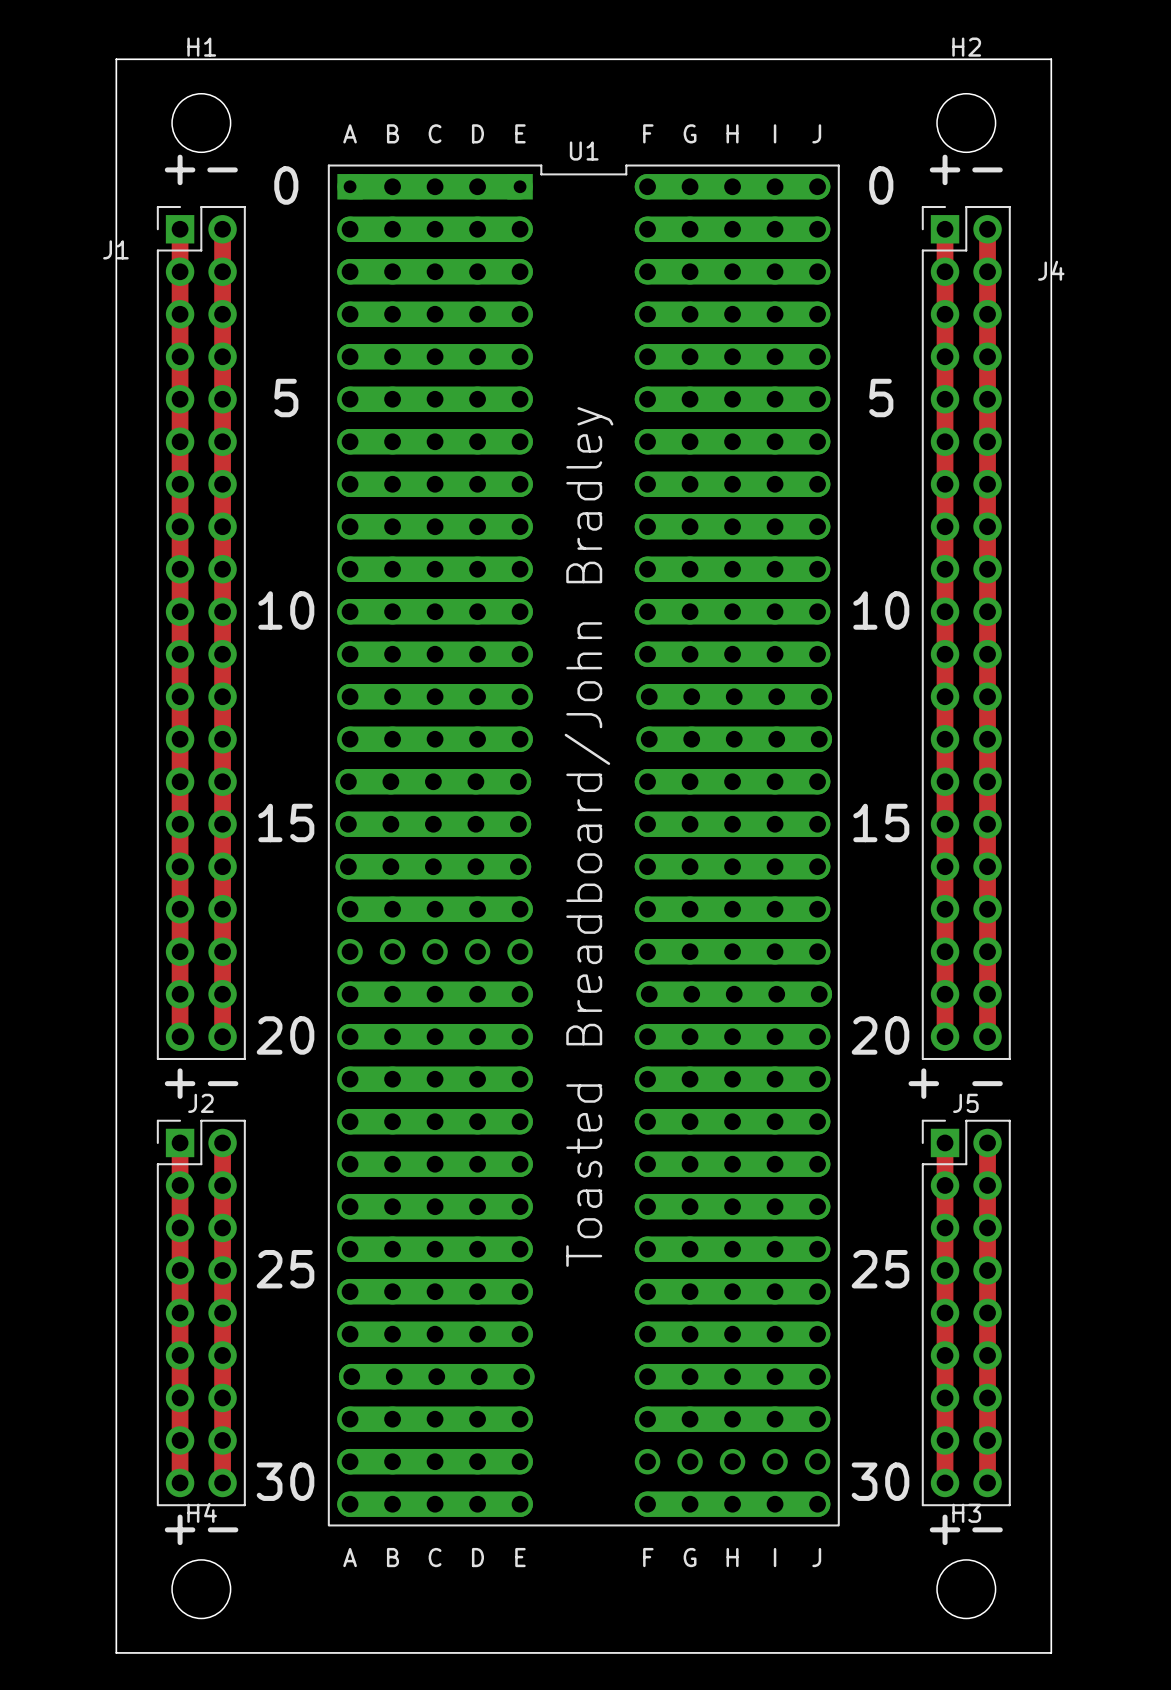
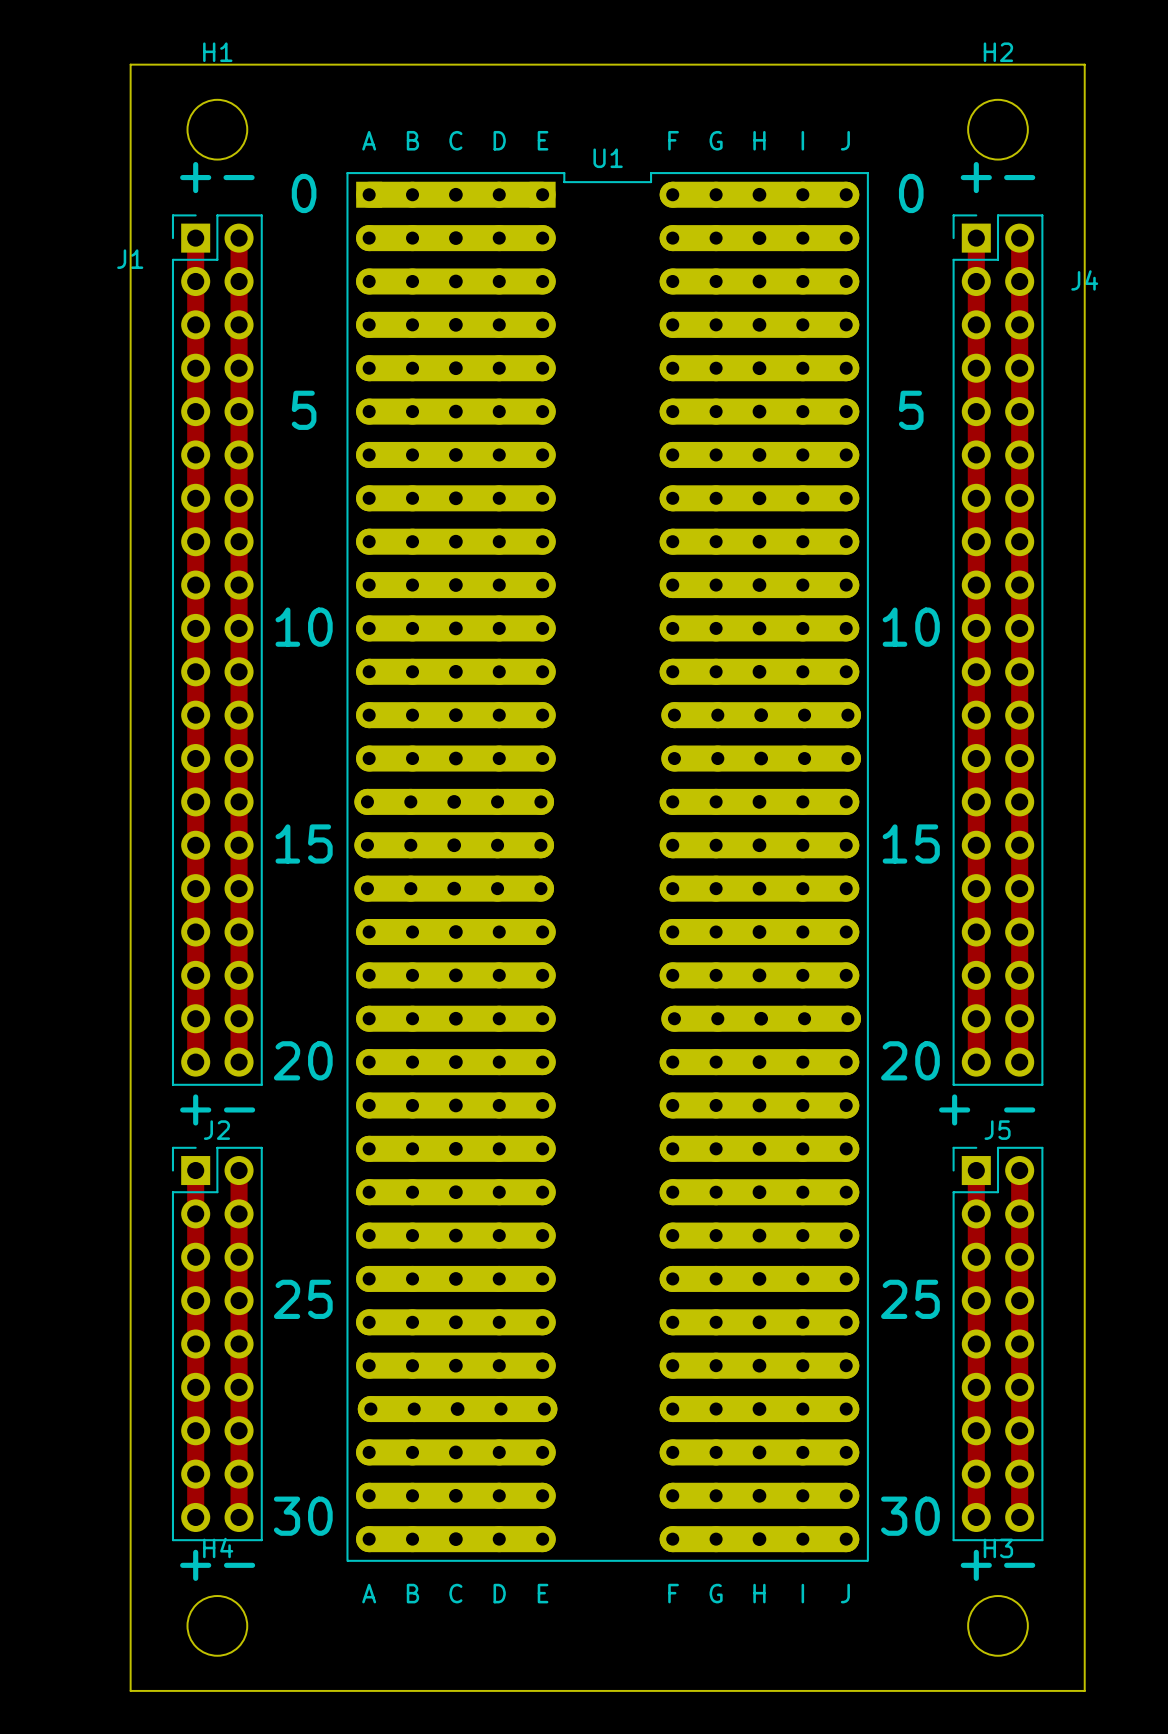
U1 footprint: [327, 164, 840, 1527] -> [346, 172, 869, 1562]
text: Toasted Breadboard/John Bradley (589, 836) -> none

